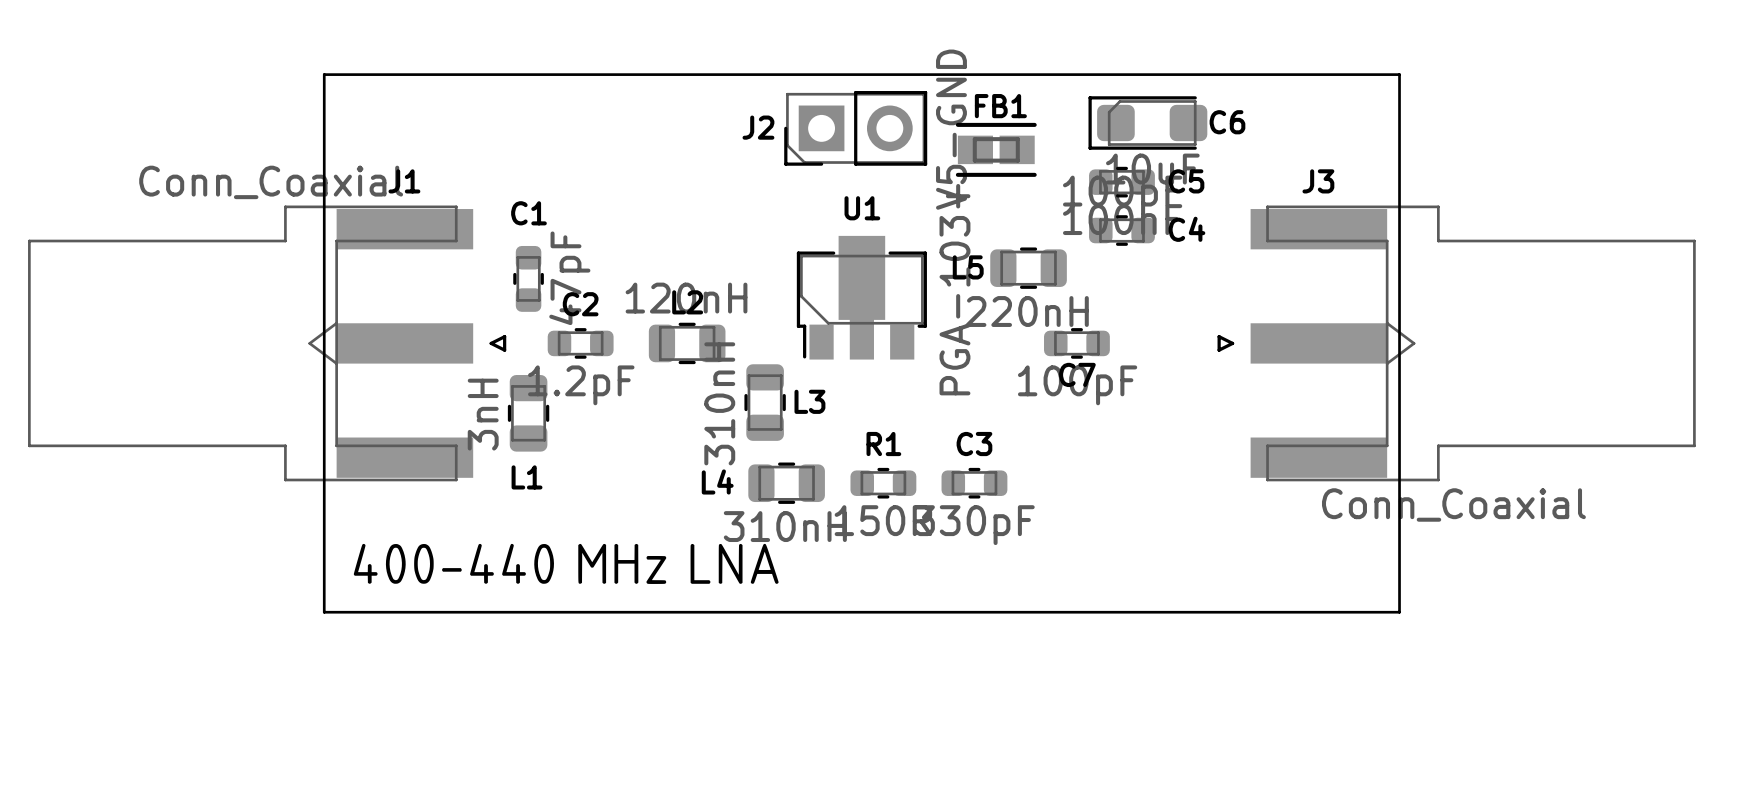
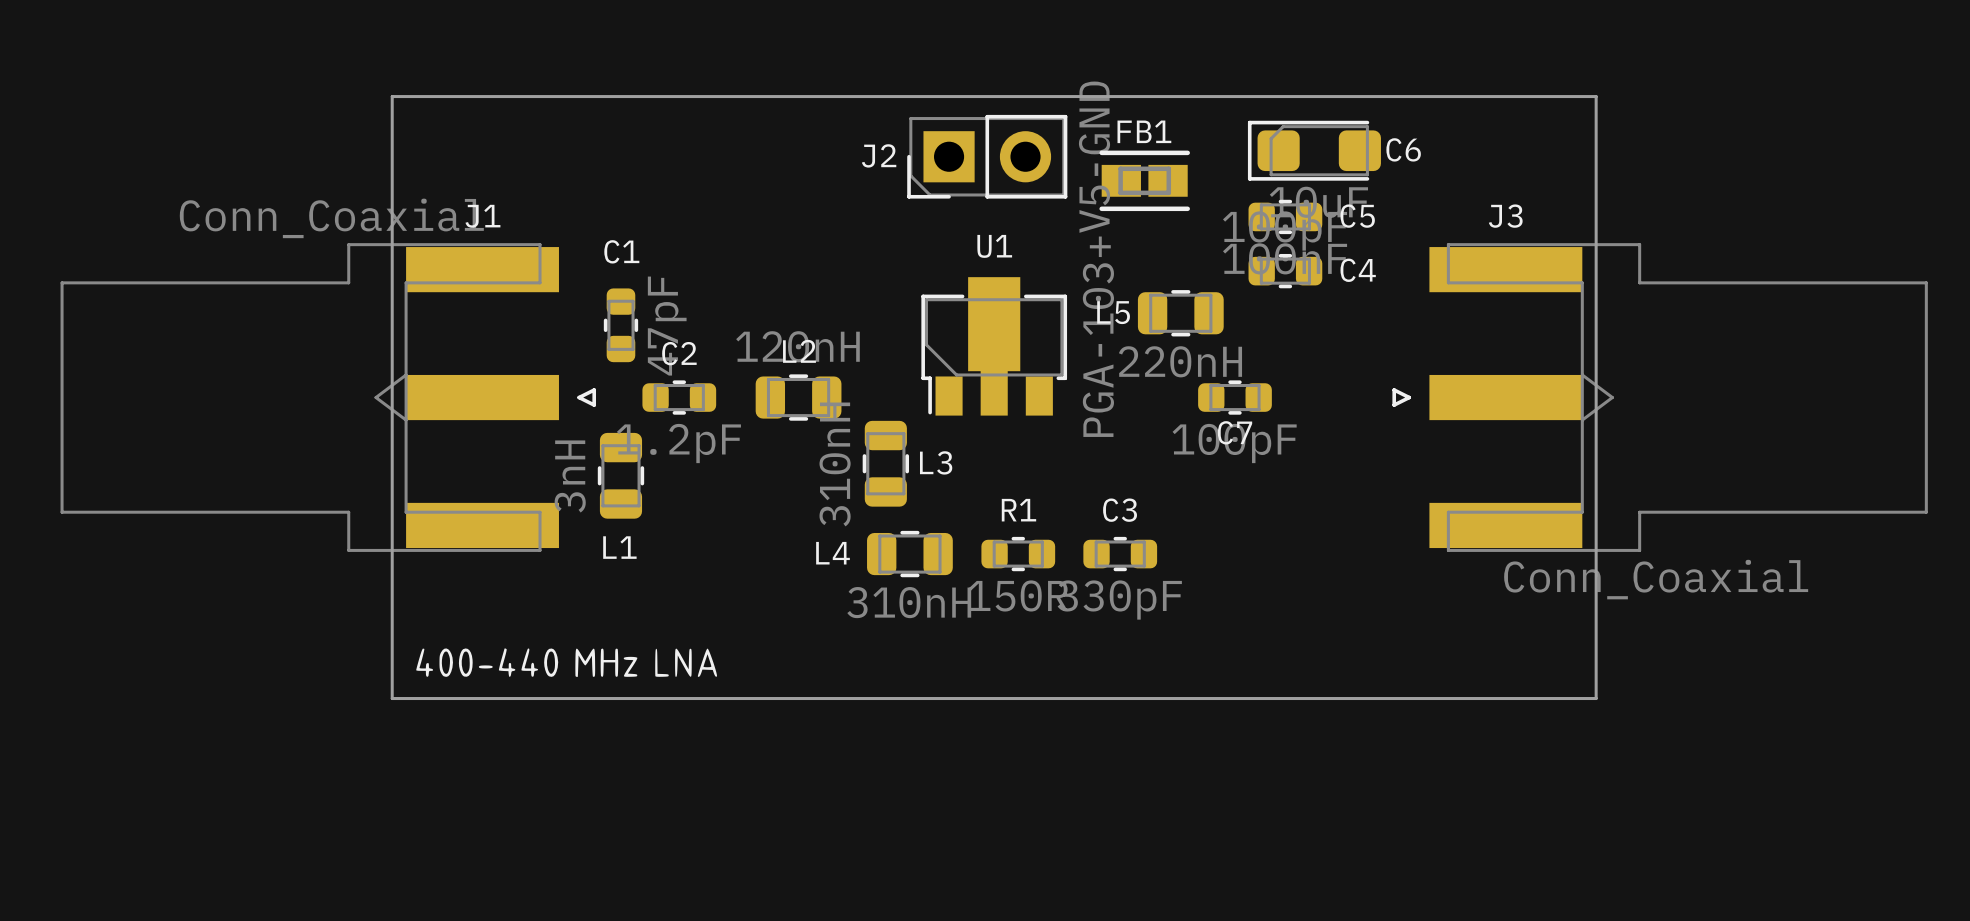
drawing: [353, 543, 779, 584] -> none
drawing: none -> [416, 648, 718, 677]

